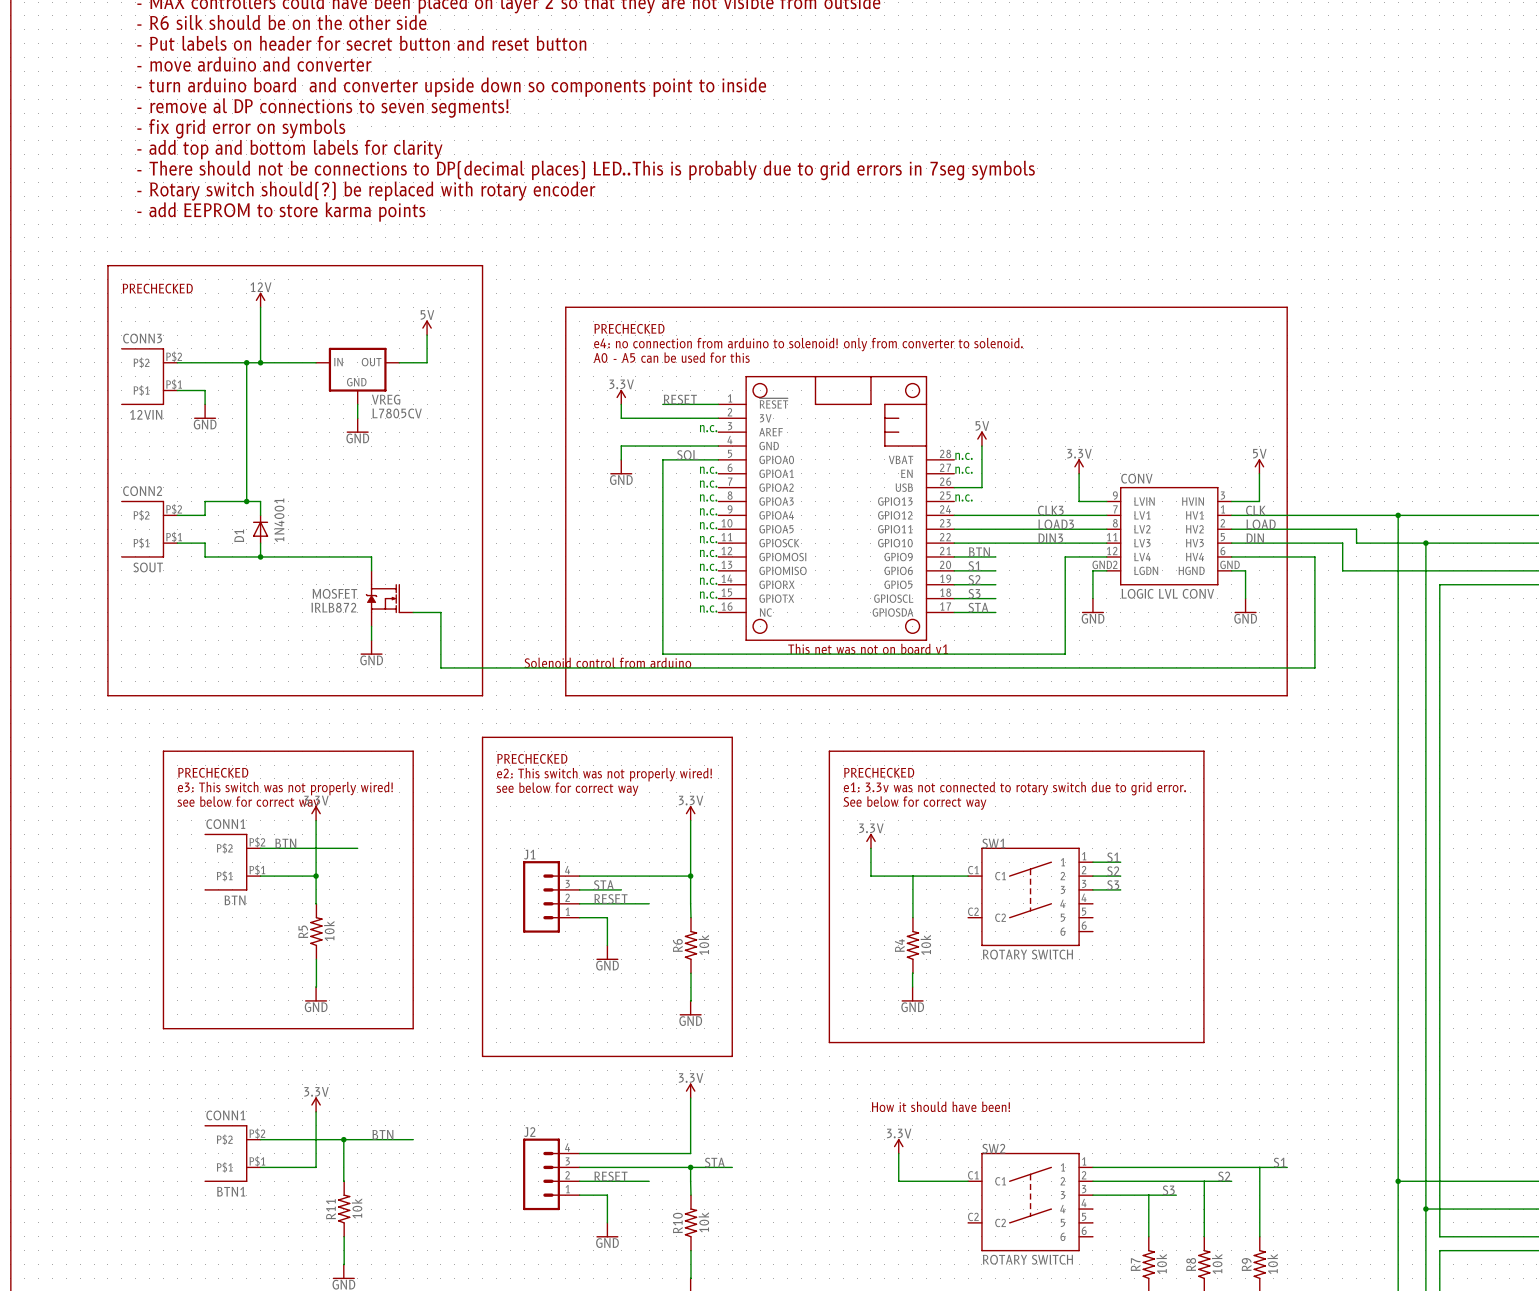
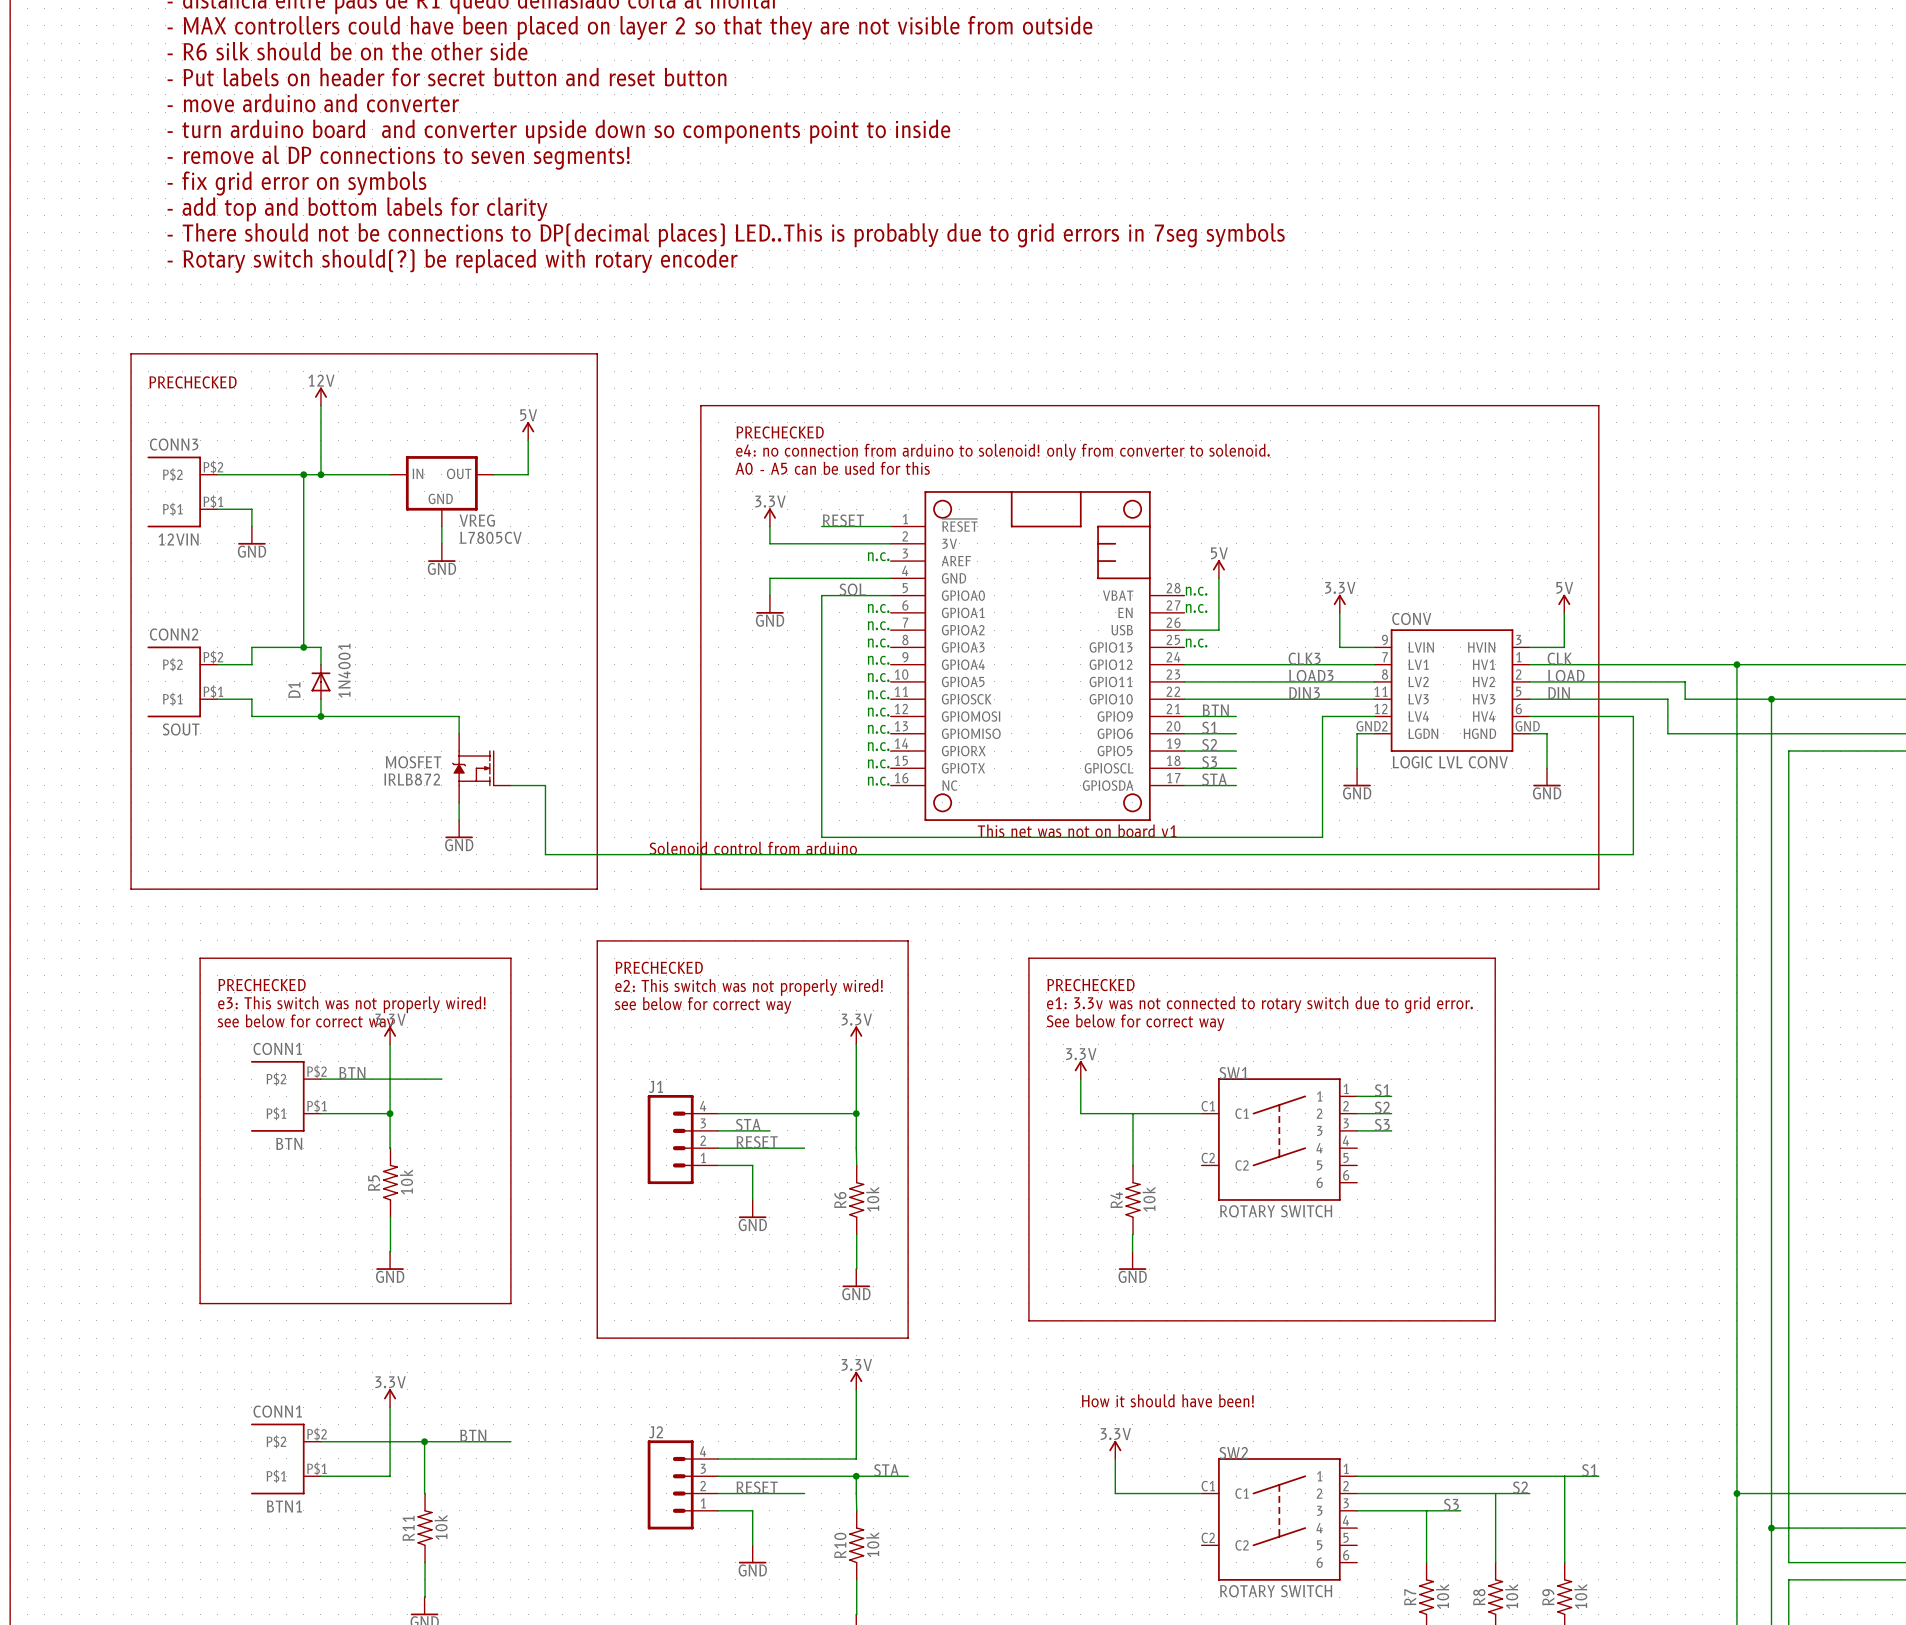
text: - add EEPROM to store karma points (281, 211) -> none

